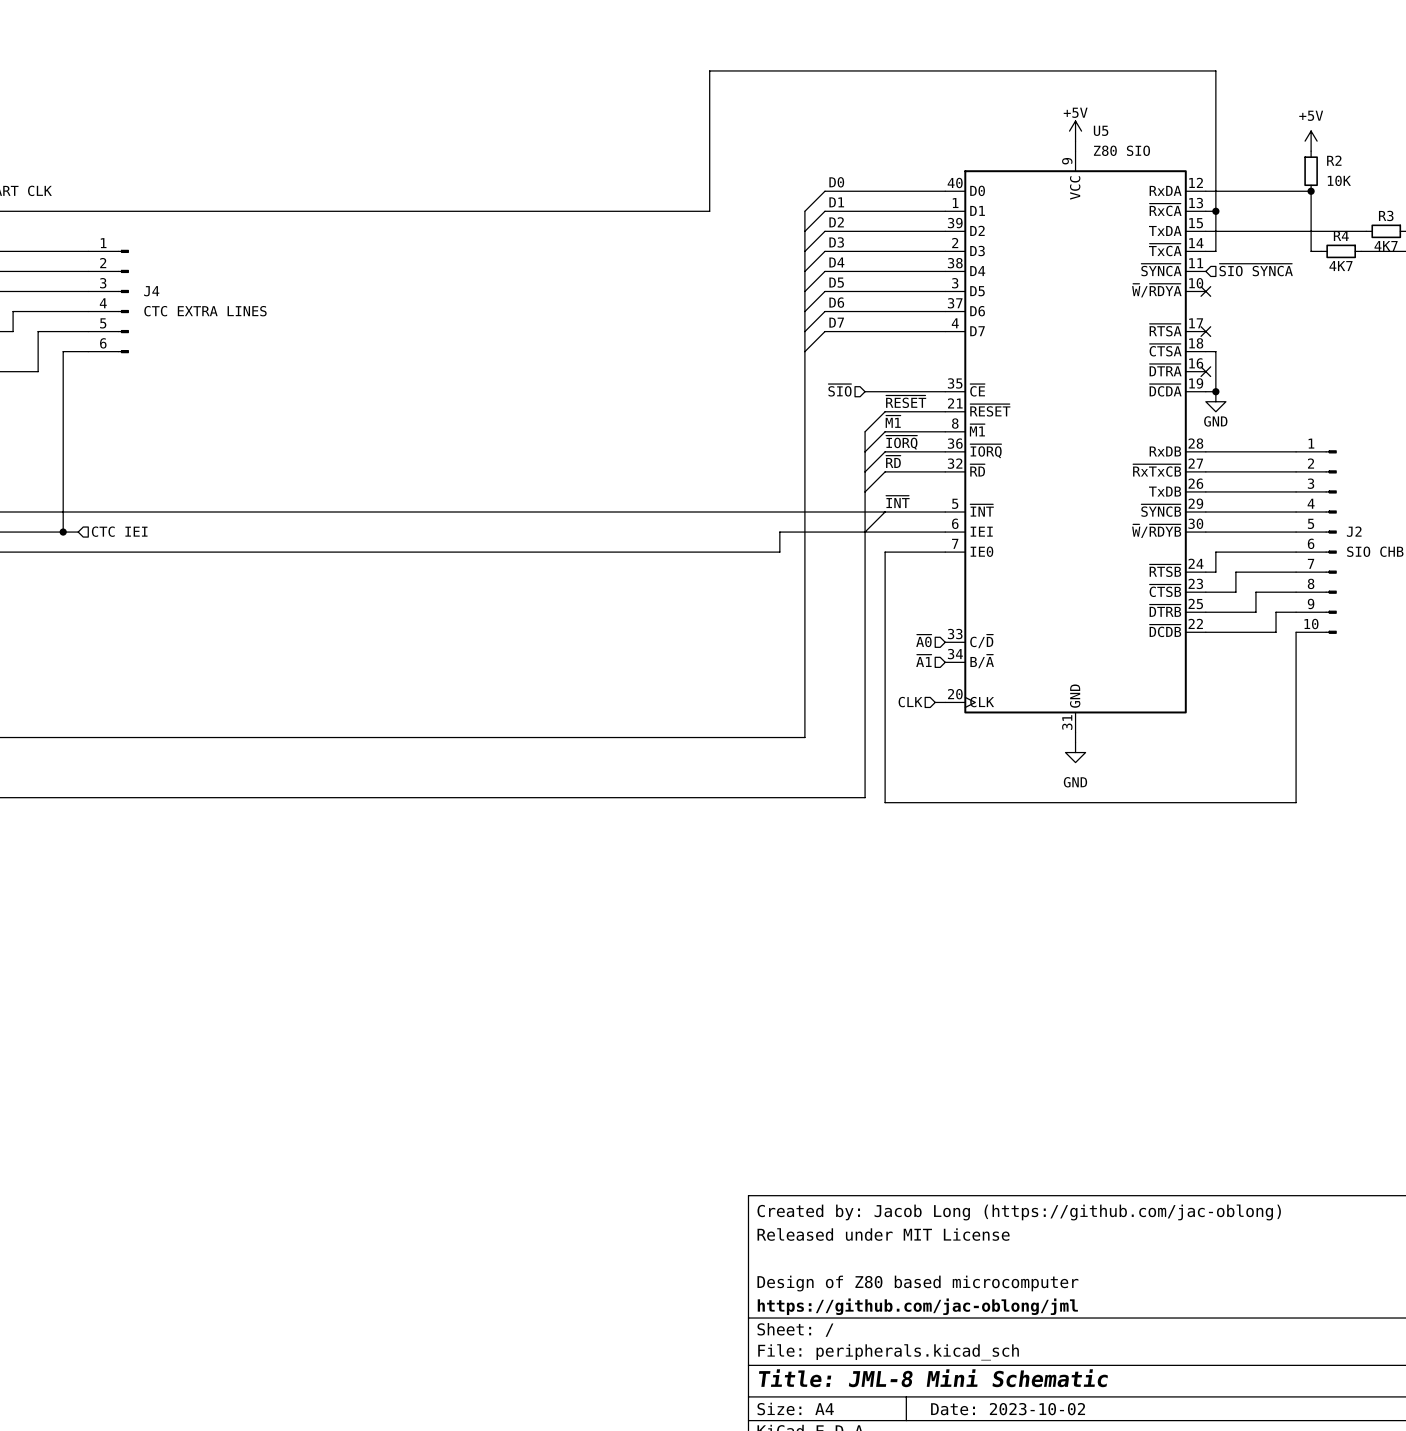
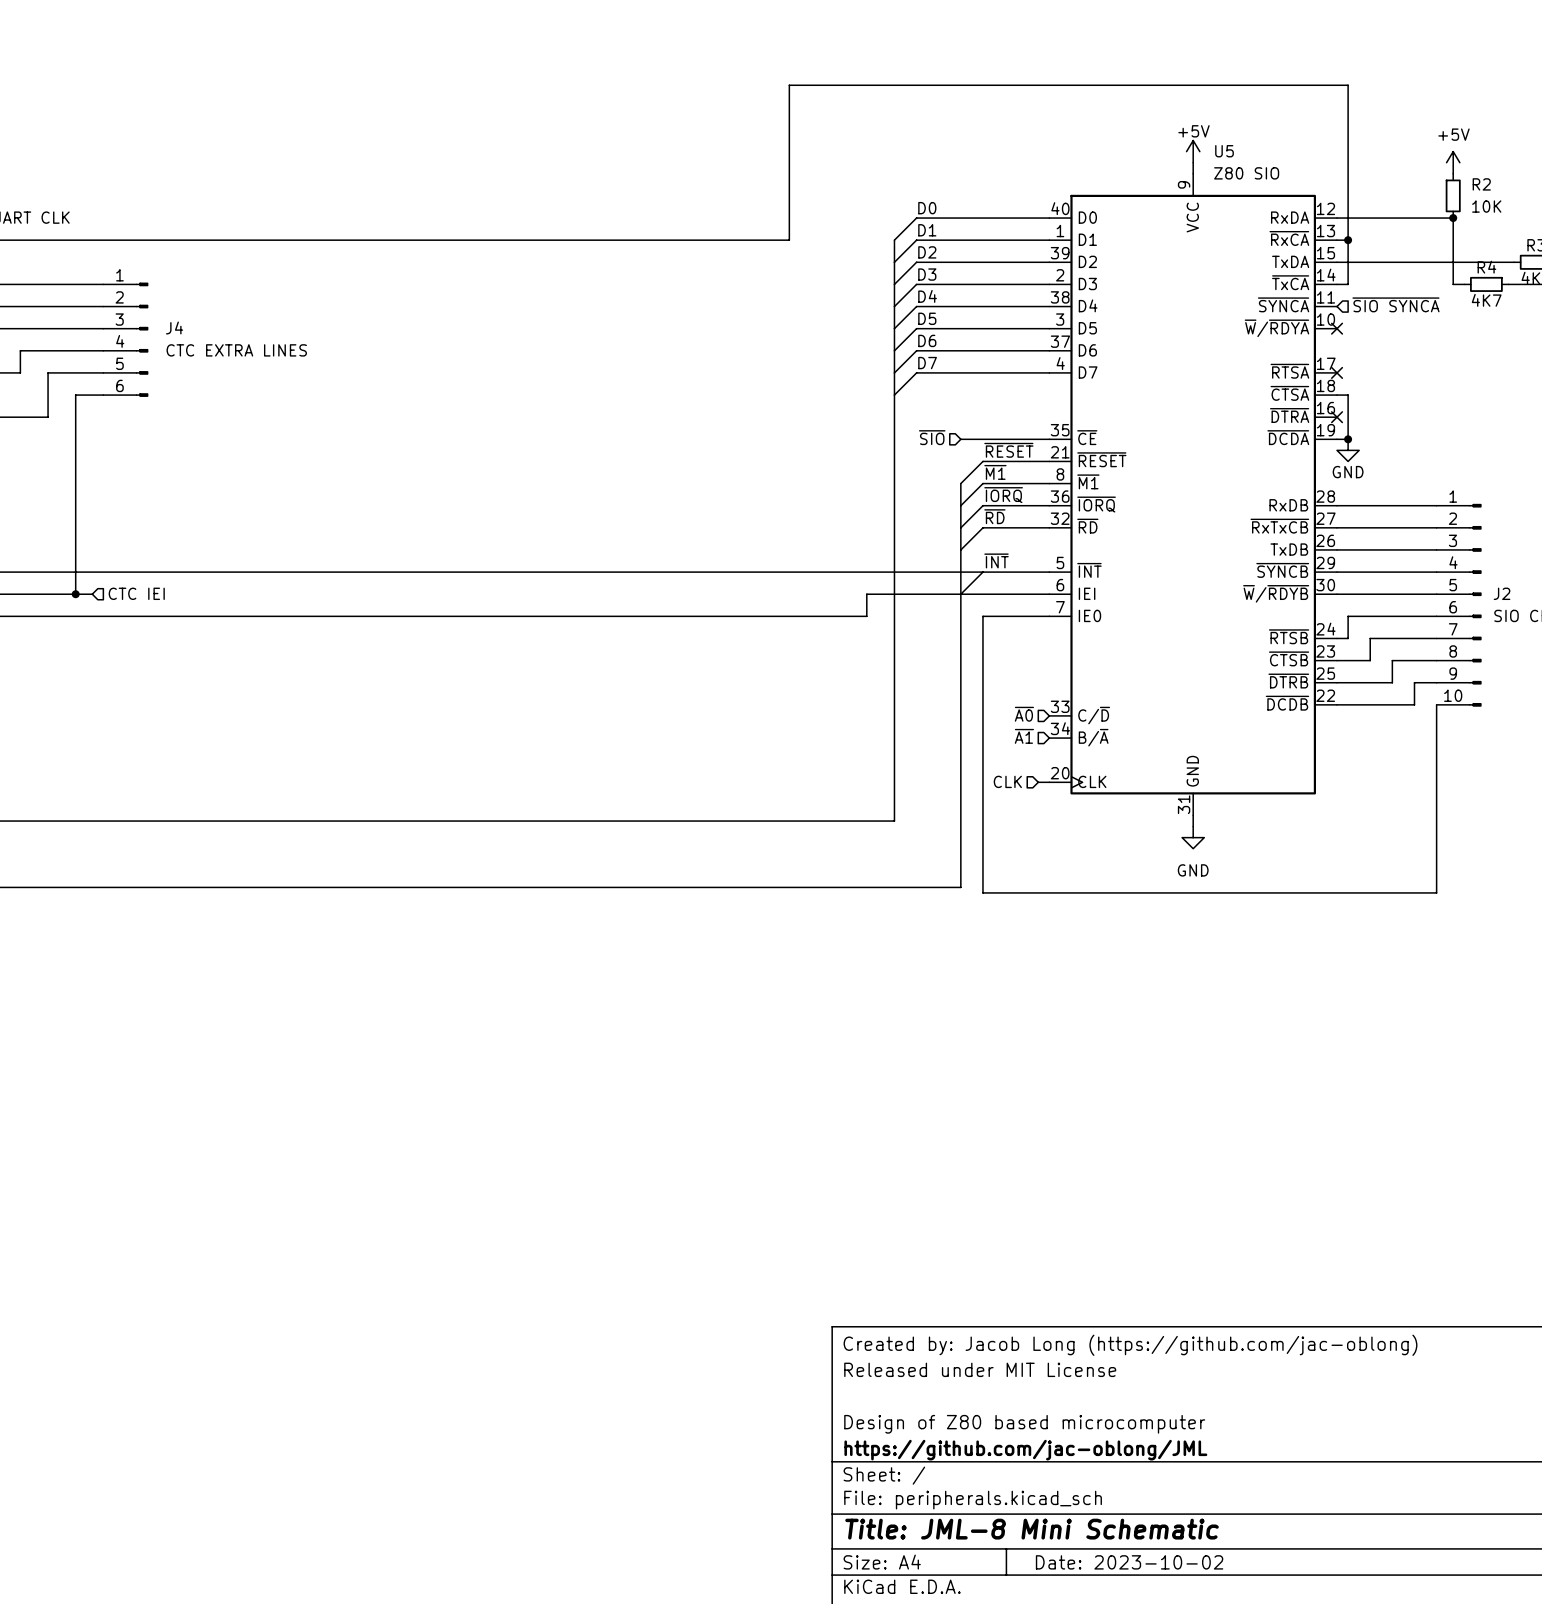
title block: https://github.com/jac-oblong/jml (917, 1306) -> https://github.com/jac-oblong/JML (1025, 1450)

